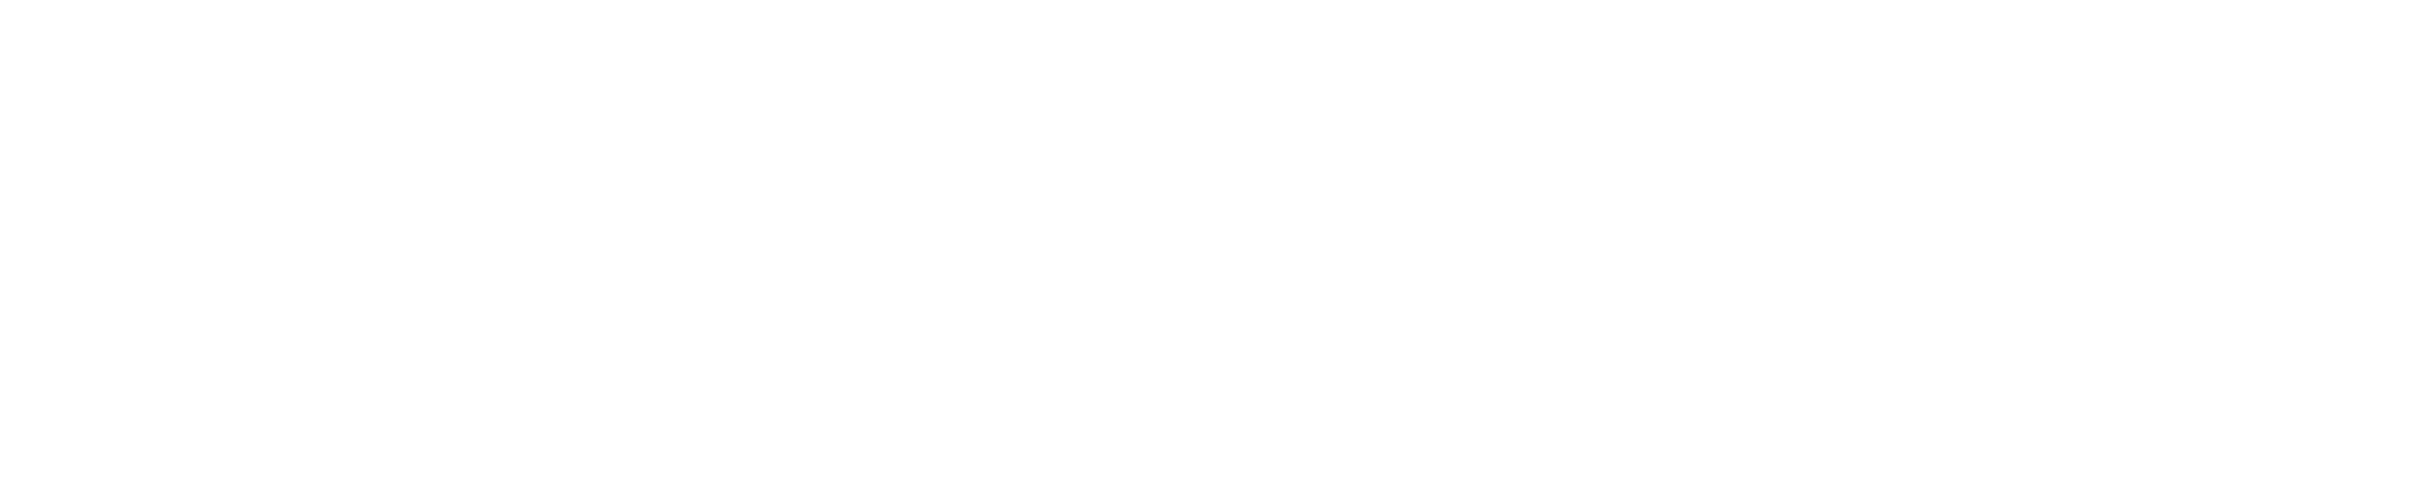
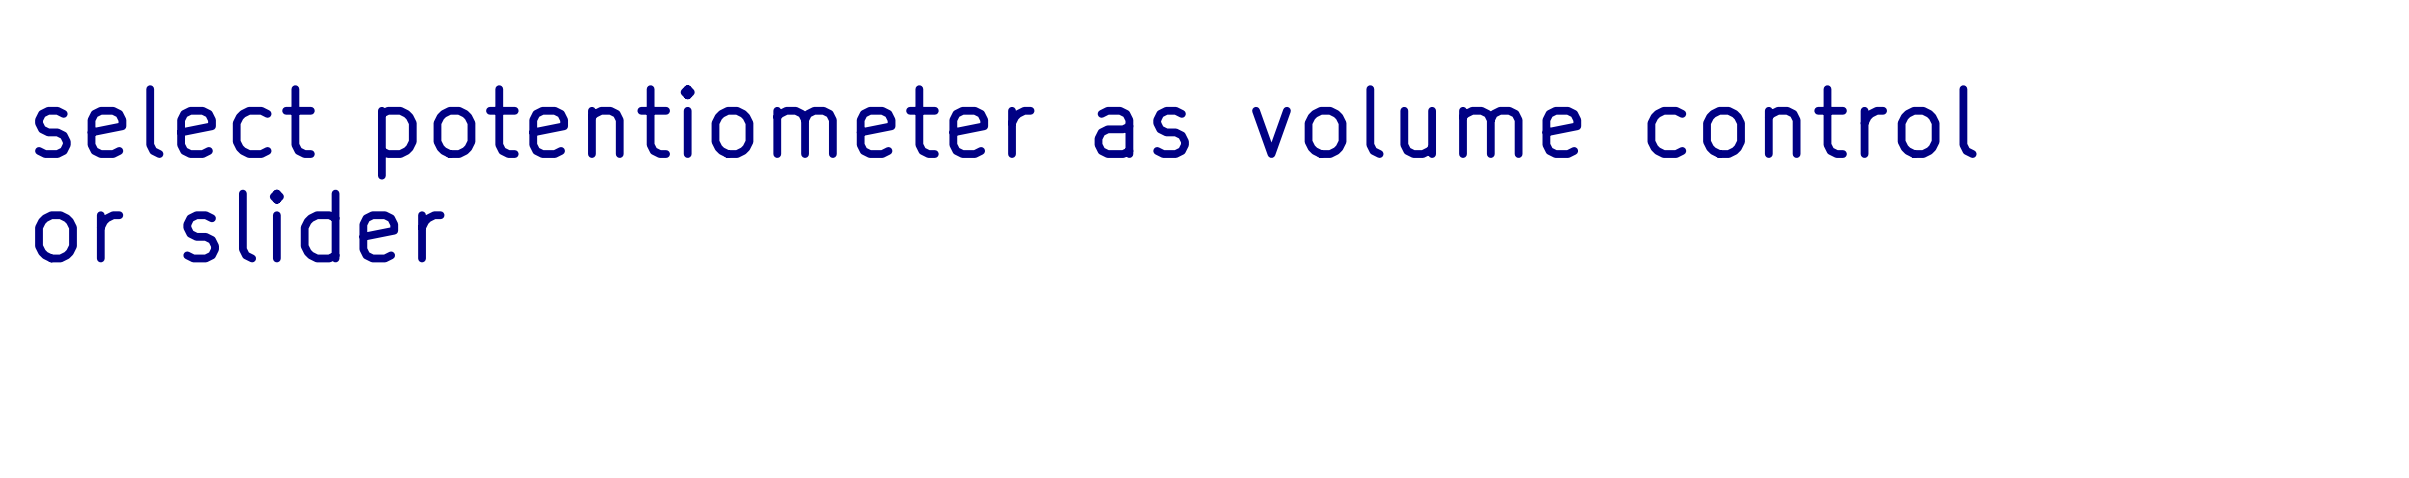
text: none -> select potentiometer as volume control (1005, 132)
text: none -> or slider (239, 226)

